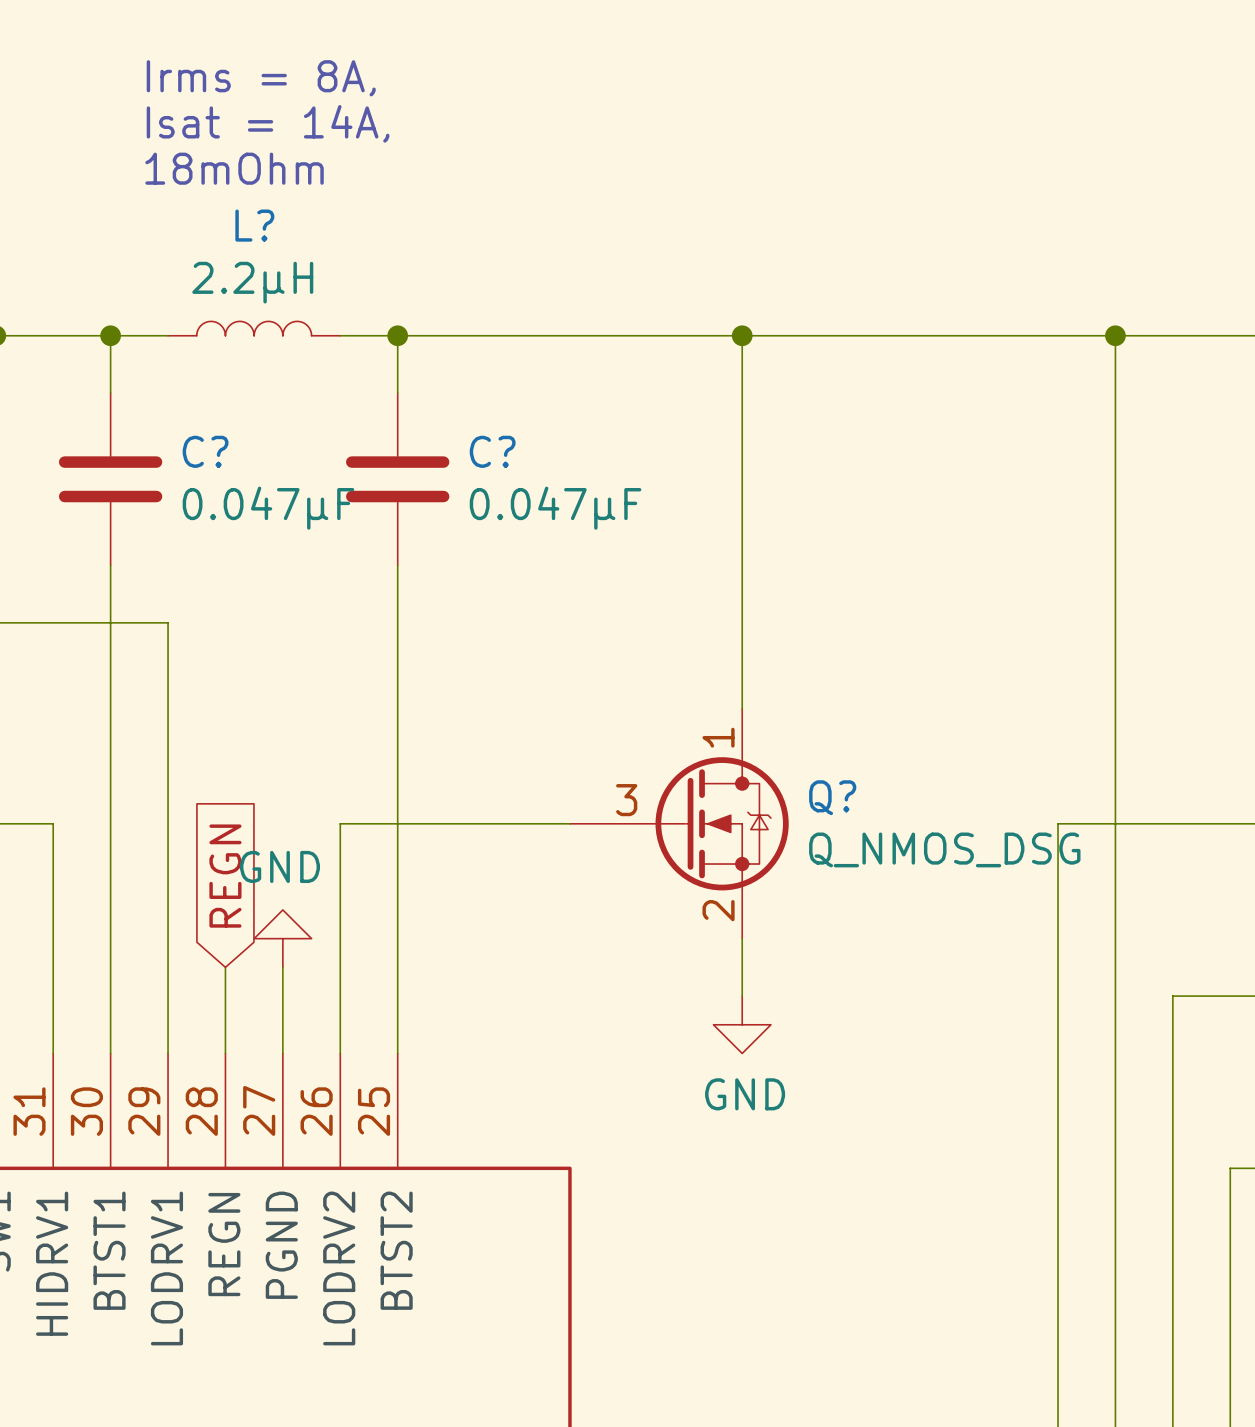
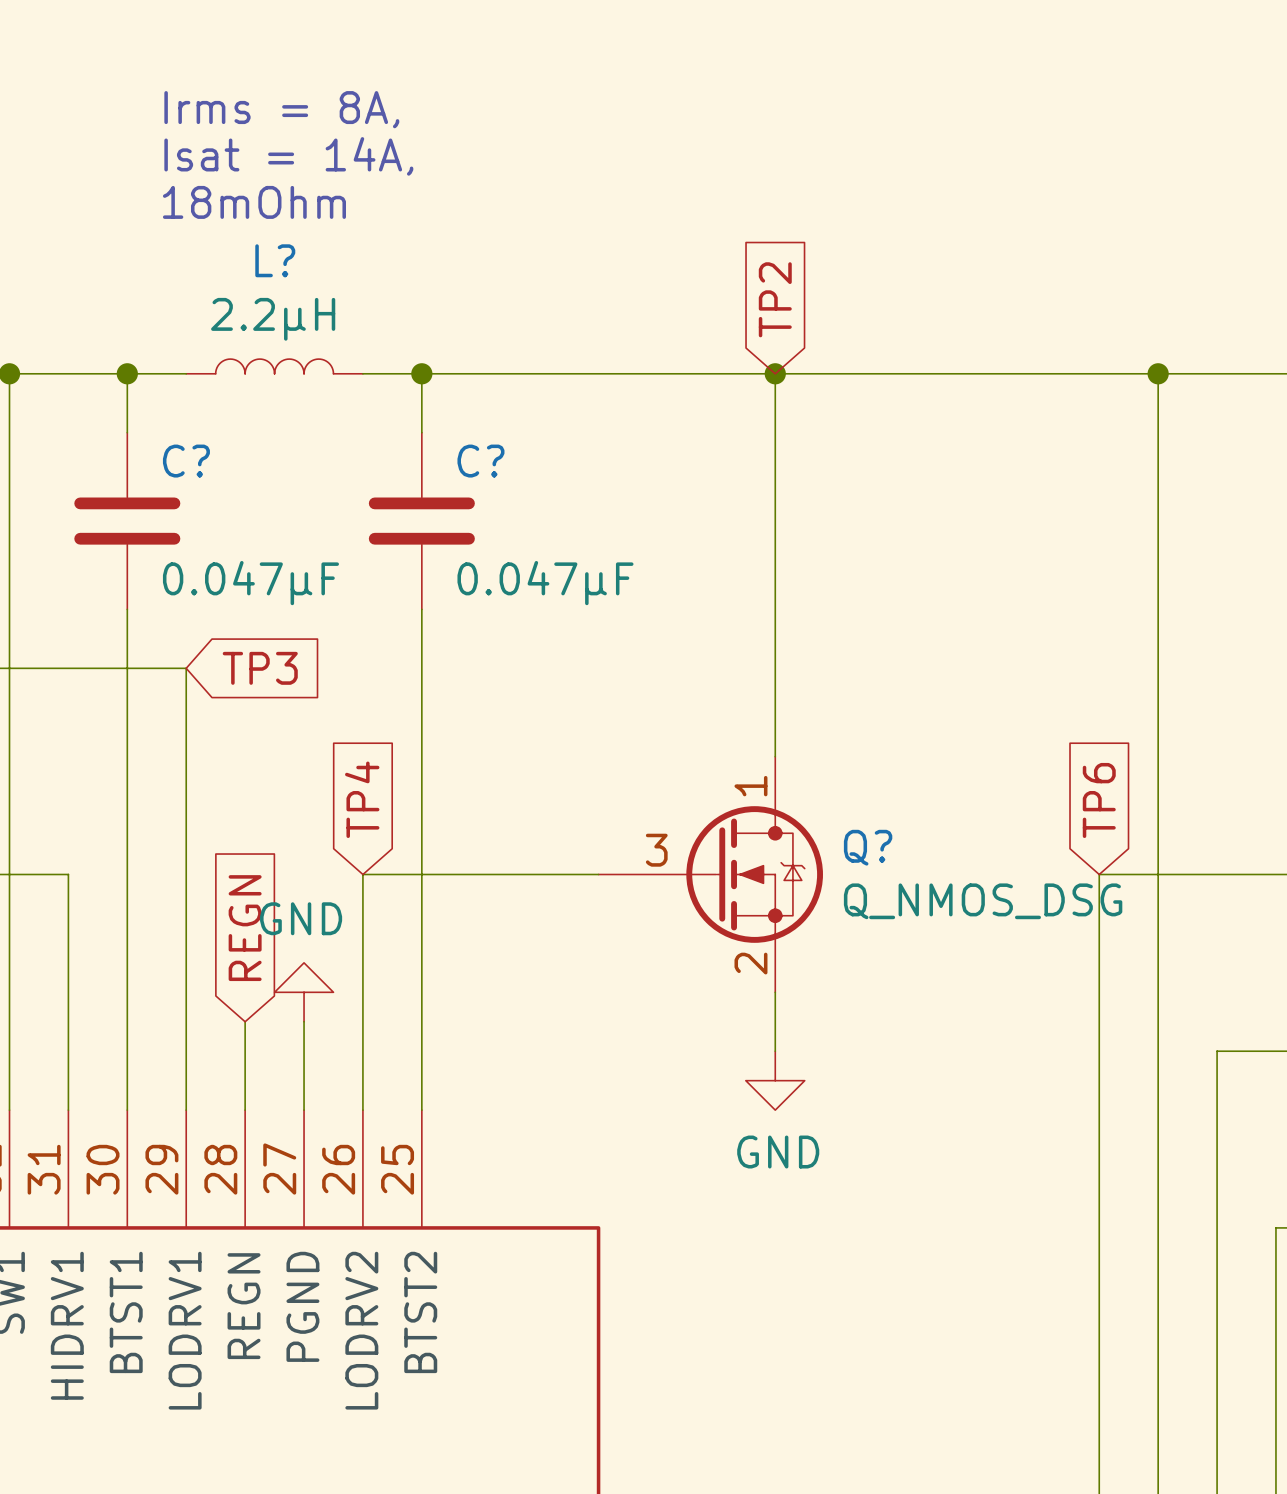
global label: none -> TP2 (775, 299)
C? name position: C? (205, 451) -> C? (186, 461)
C? name position: C? (492, 451) -> C? (480, 461)
C? value position: 0.047µF (268, 508) -> 0.047µF (250, 583)
C? value position: 0.047µF (555, 508) -> 0.047µF (545, 583)
global label: none -> TP3 (260, 668)
global label: none -> TP4 (362, 799)
global label: none -> TP6 (1099, 800)

